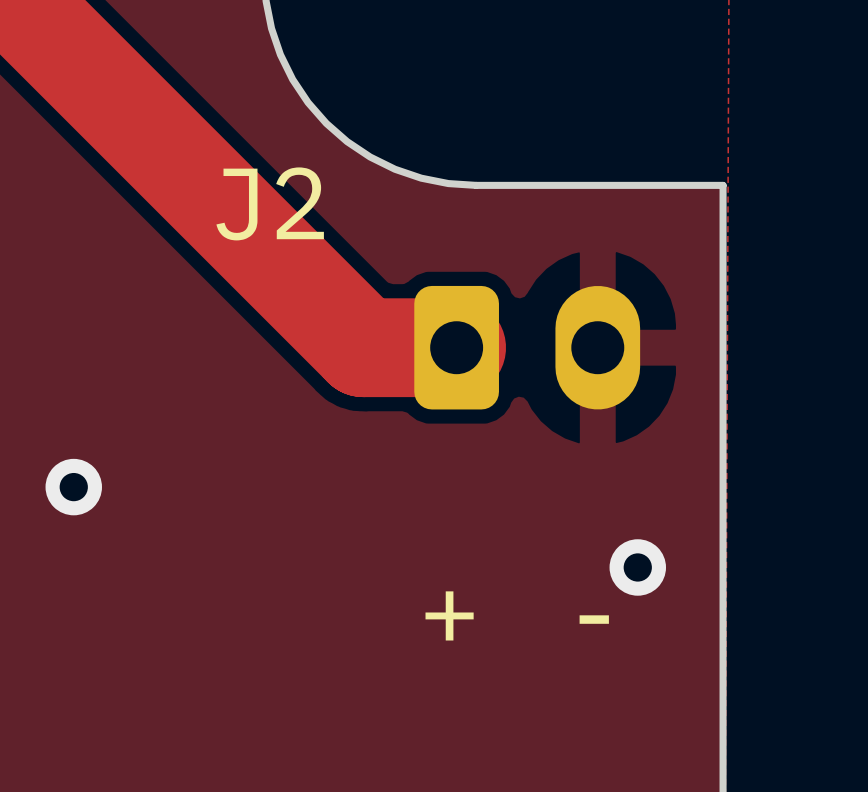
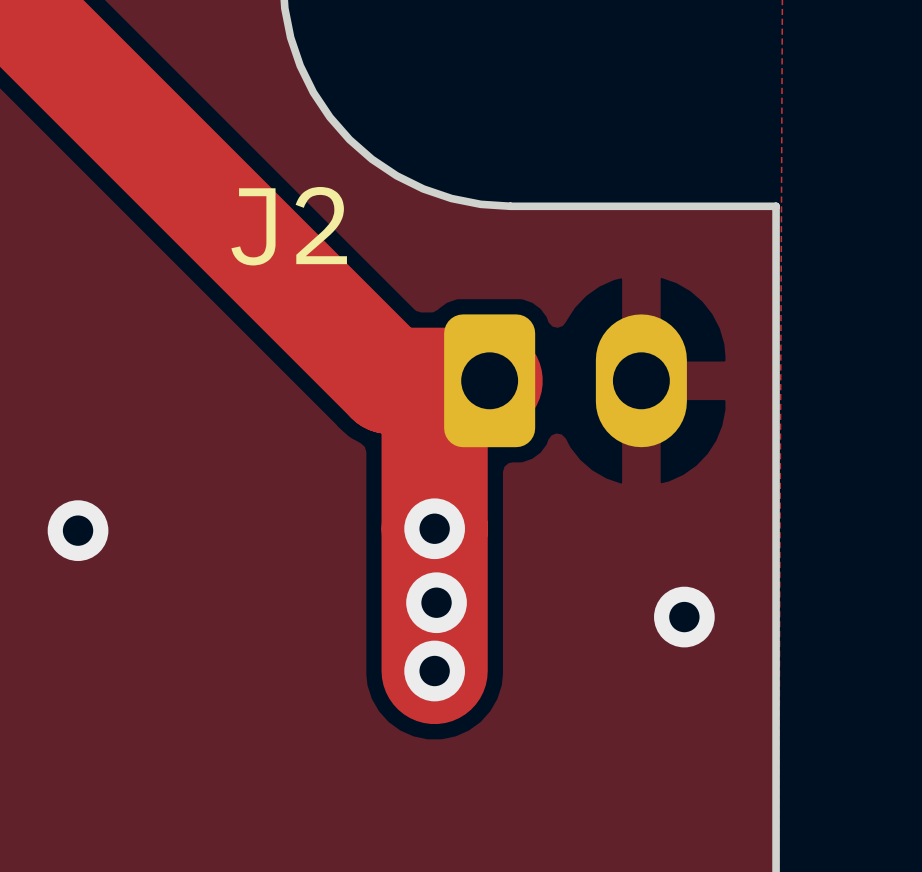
track: none -> (434, 388) (434, 671)
via: none -> (434, 528)
via: none -> (436, 602)
text: + (449, 615) -> none
via: none -> (434, 671)
text: - (594, 619) -> none

